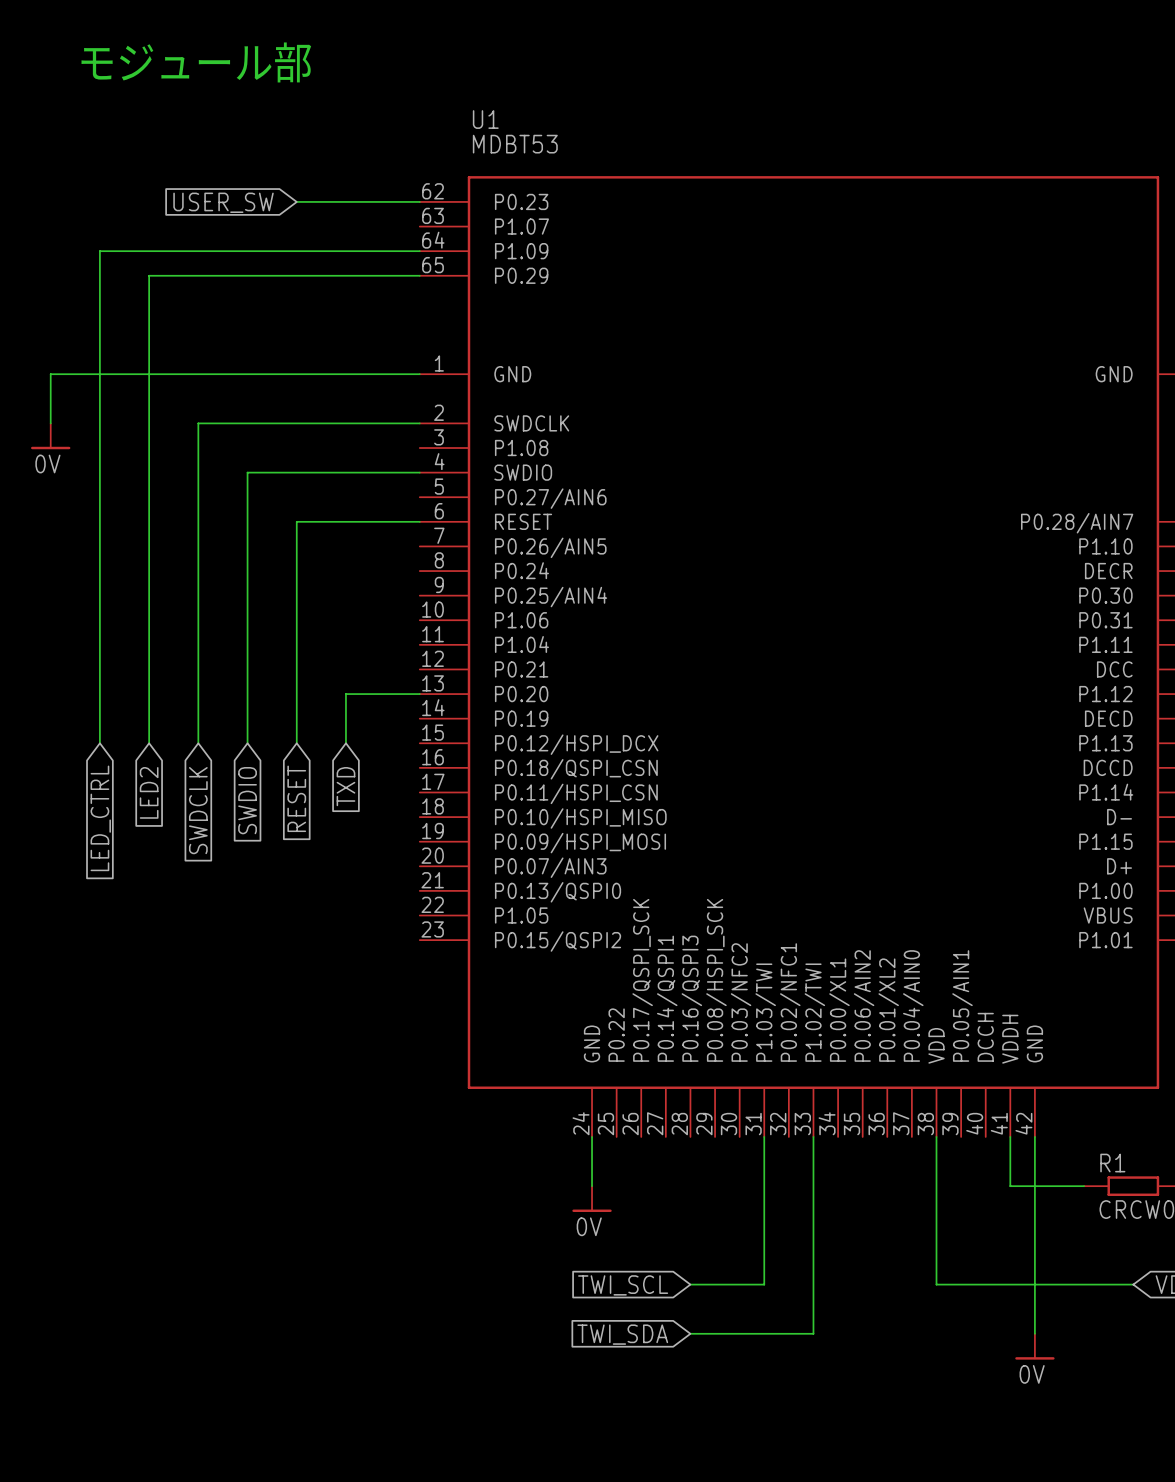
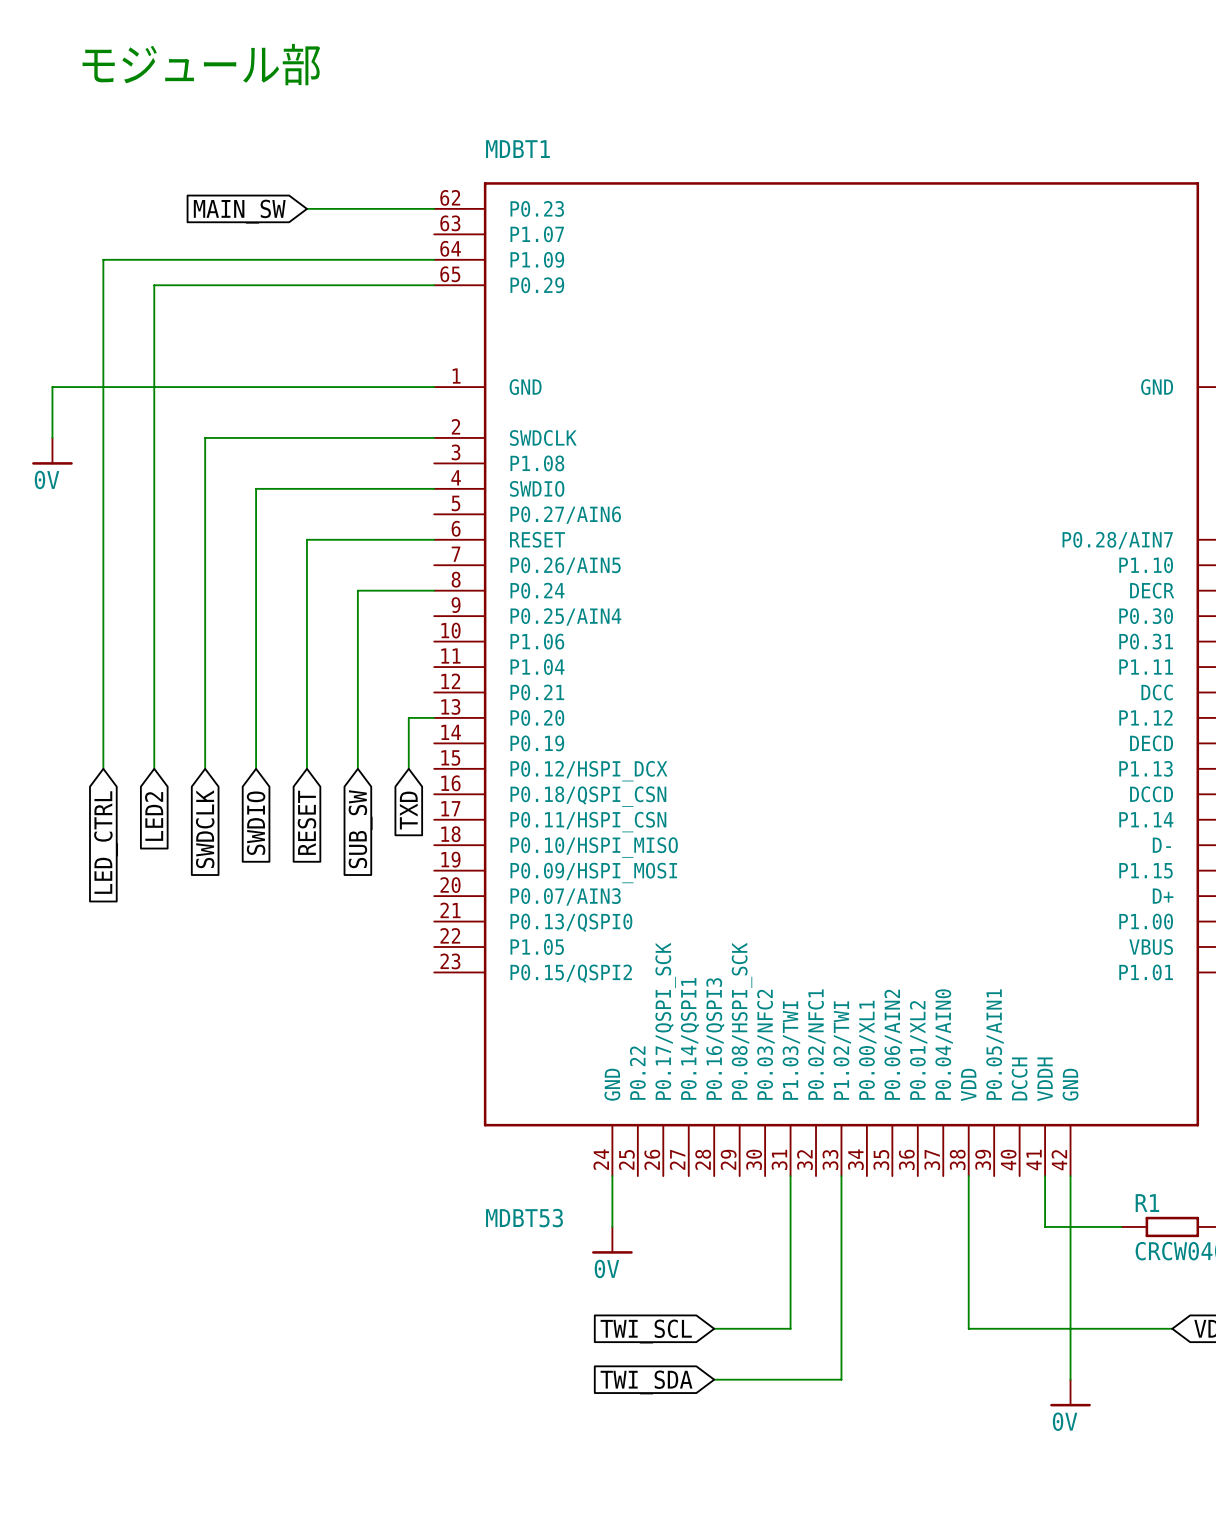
U1 name: U1 (485, 119) -> MDBT1 (517, 149)
U1 value position: MDBT53 (515, 144) -> MDBT53 (524, 1218)
global label: USER_SW (223, 202) -> MAIN_SW (239, 211)
wire: none -> (434, 590) (357, 590) (357, 717)
wire: (345, 694) (395, 694) -> (408, 768) (408, 717)
global label: TXD (345, 786) -> SUB_SW (360, 829)
global label: none -> TXD (408, 810)

